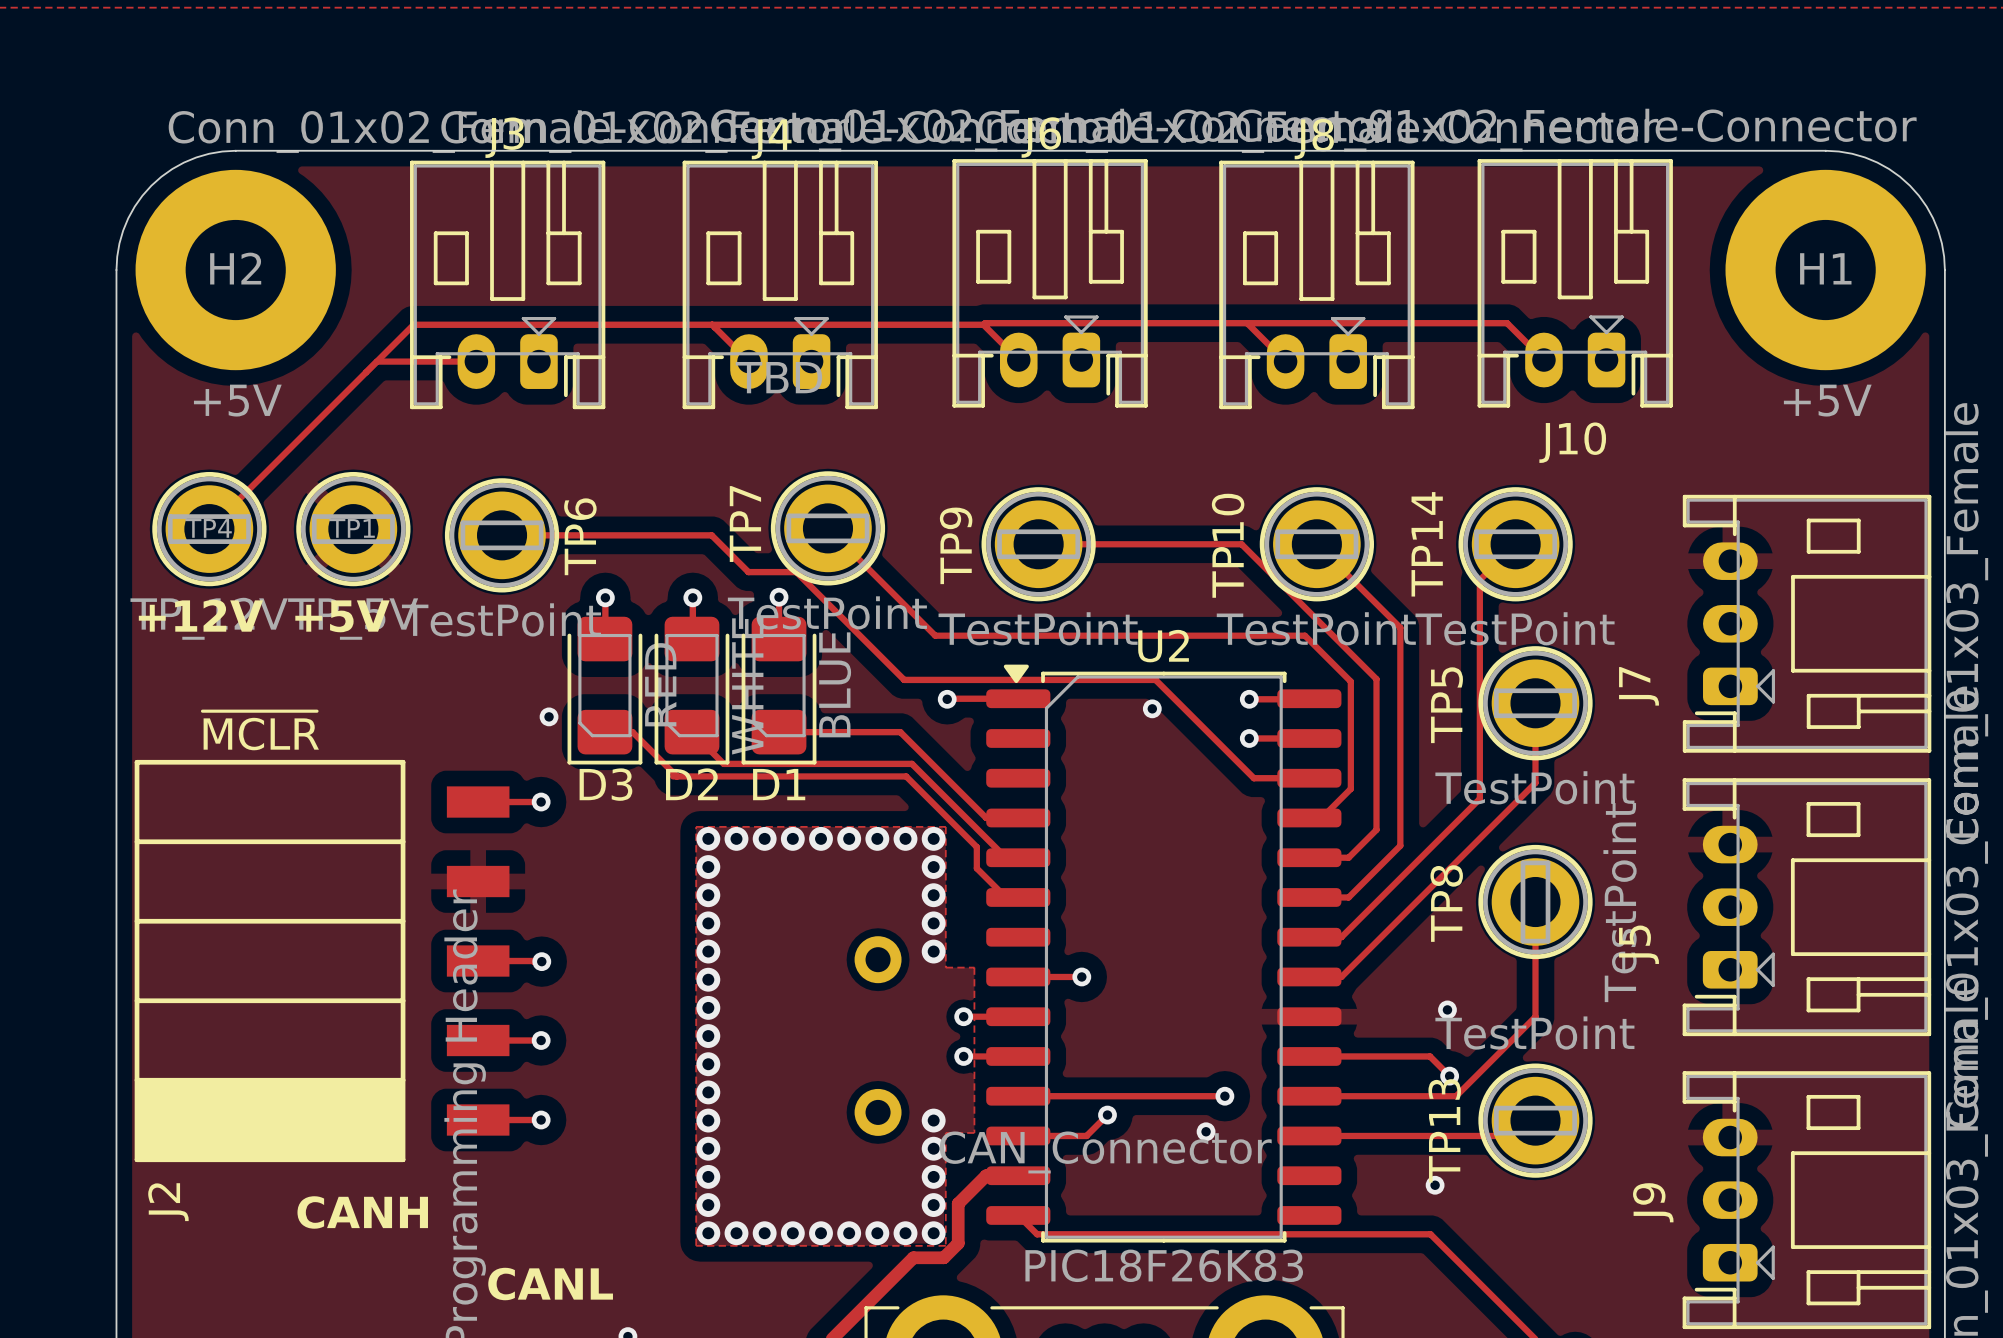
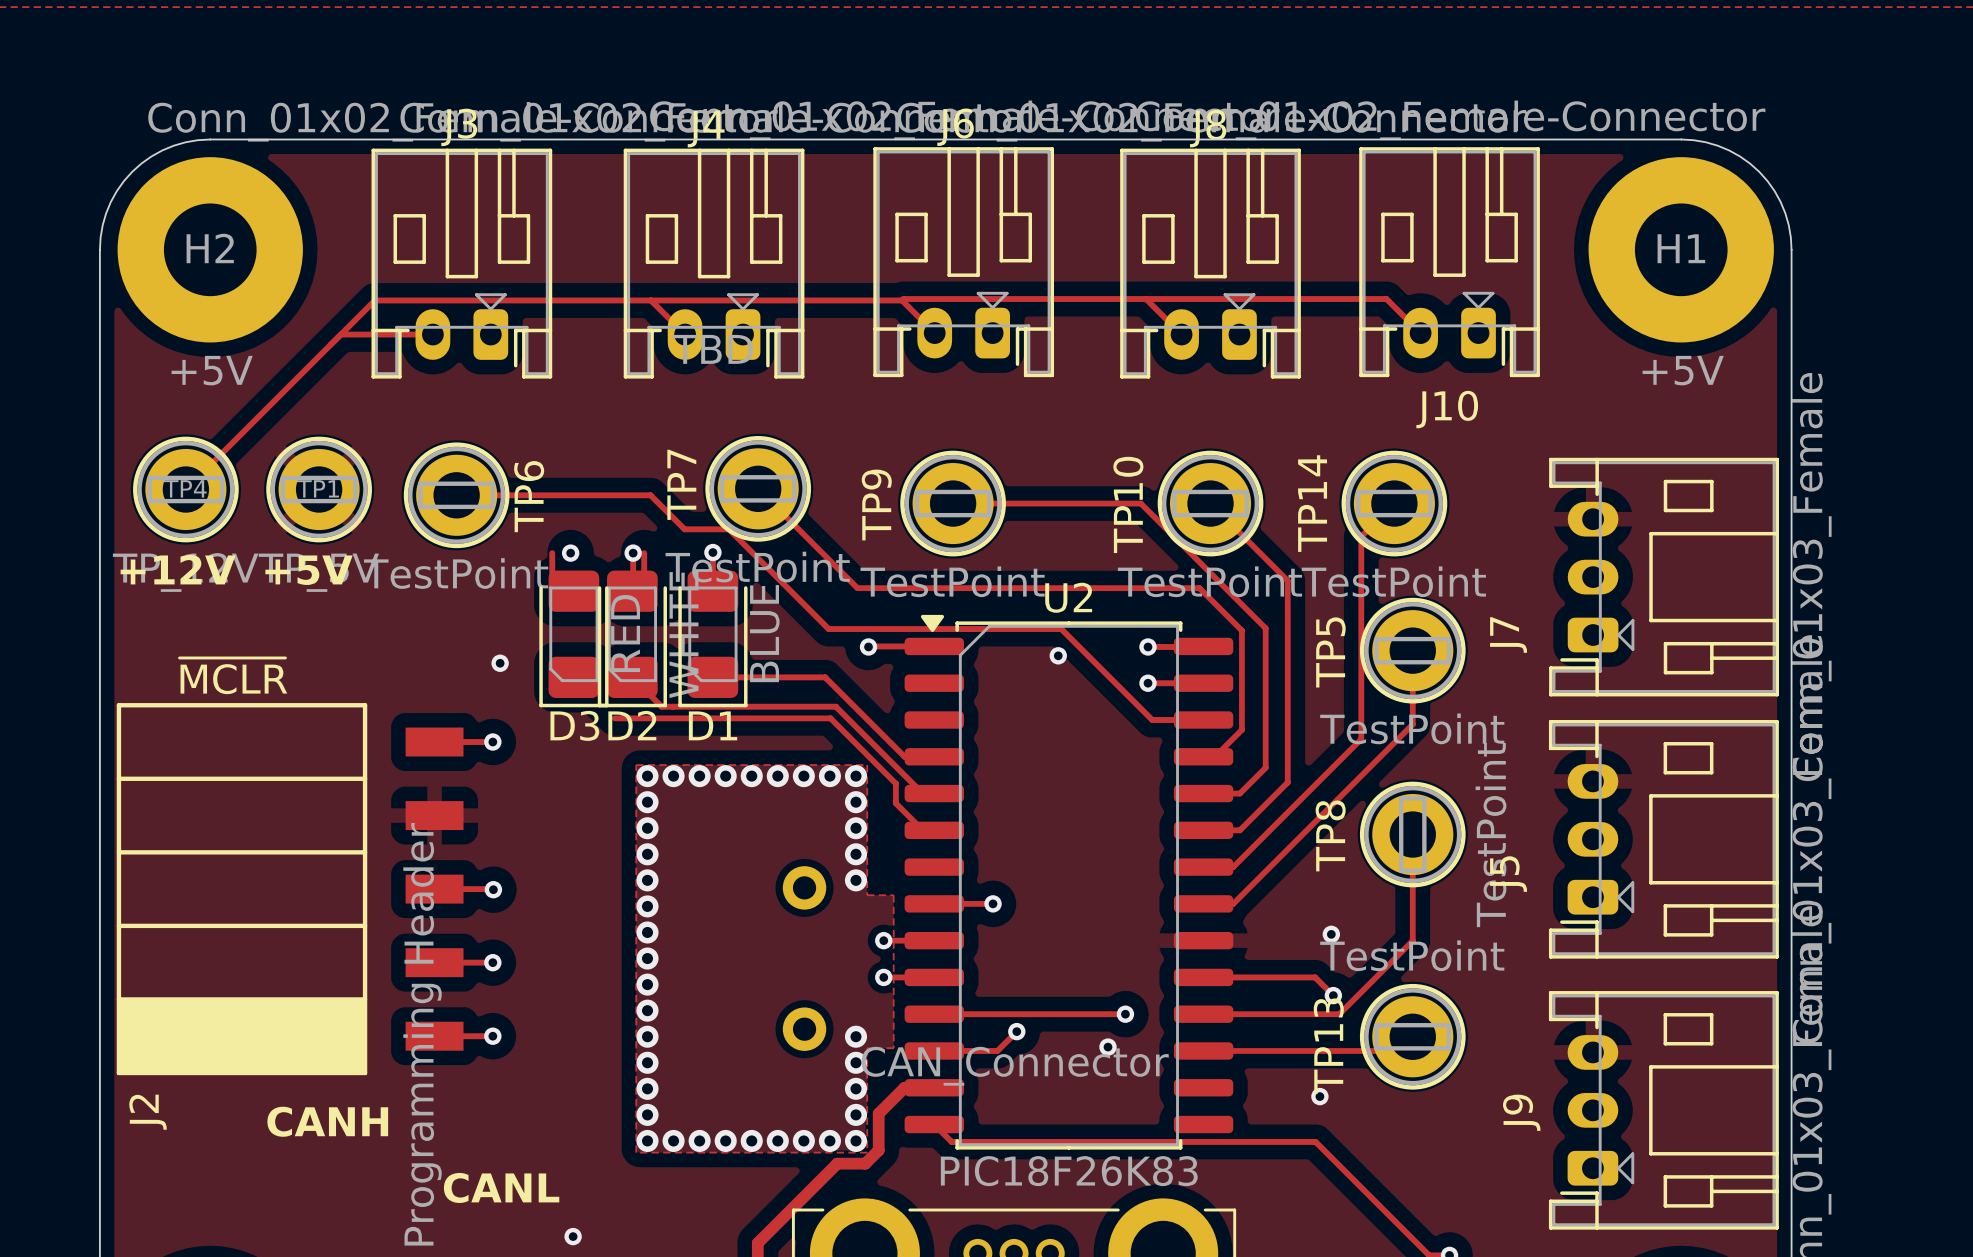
via position: (605, 597) -> (570, 553)
track: none -> (644, 553) (644, 591)
D3 position: (604, 690) -> (573, 638)
track: (604, 732) (632, 732) (676, 776) -> none

